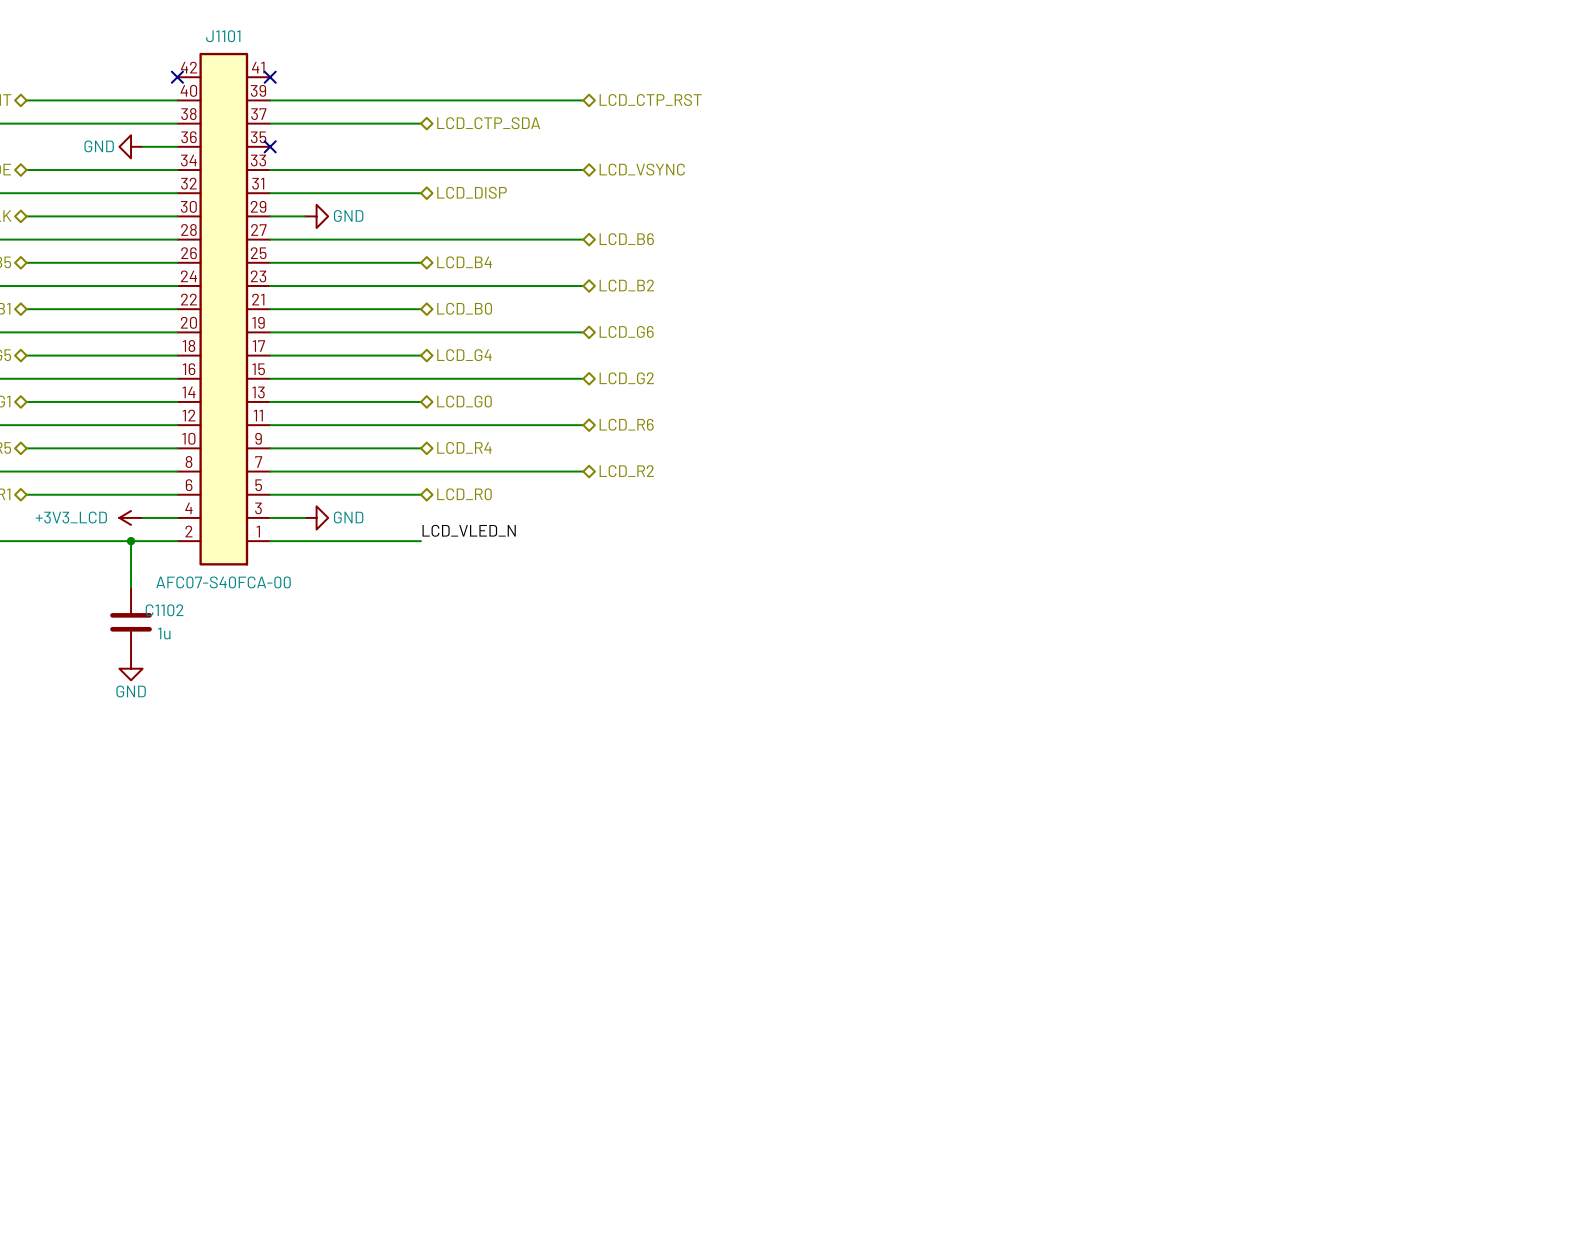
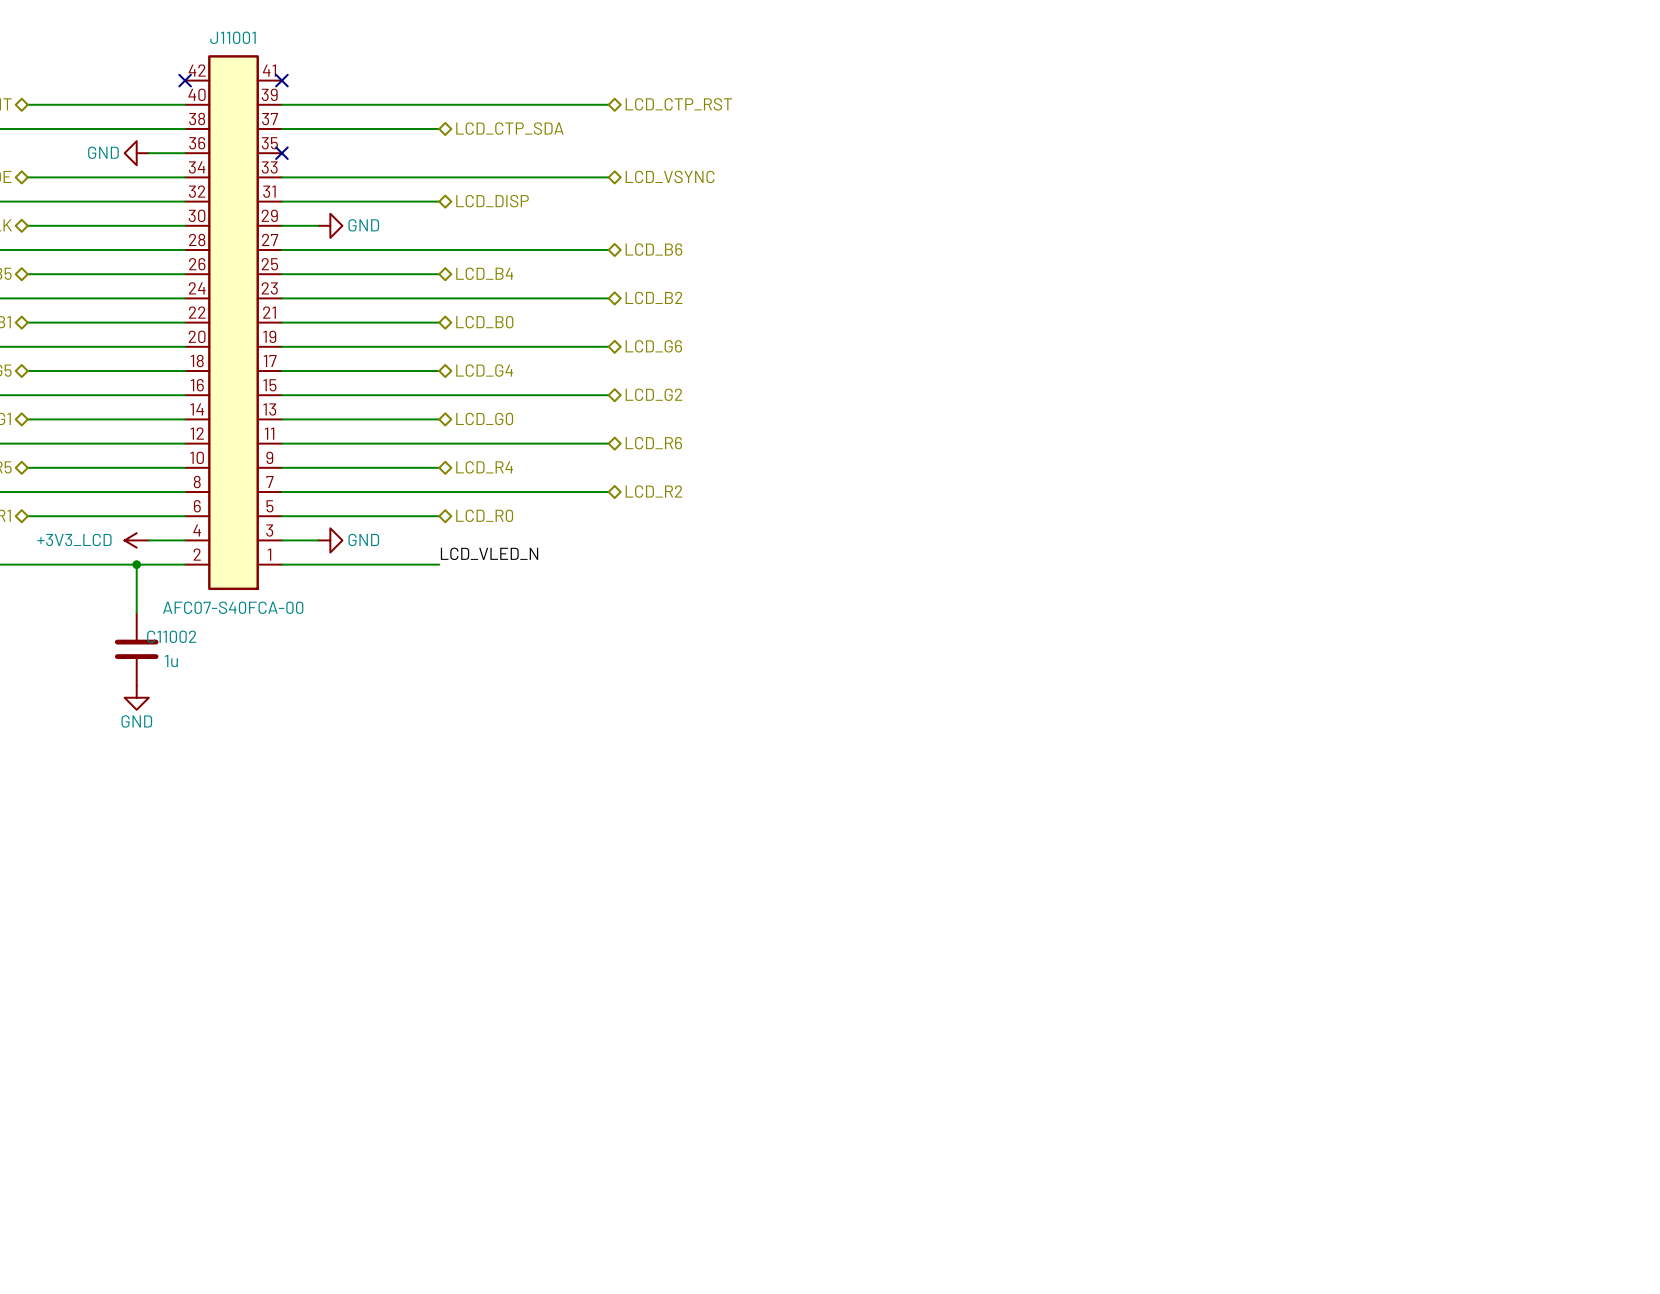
J1101 name: J1101 (223, 36) -> J11001 (232, 37)
C1102 name: C1102 (164, 610) -> C11002 (171, 636)

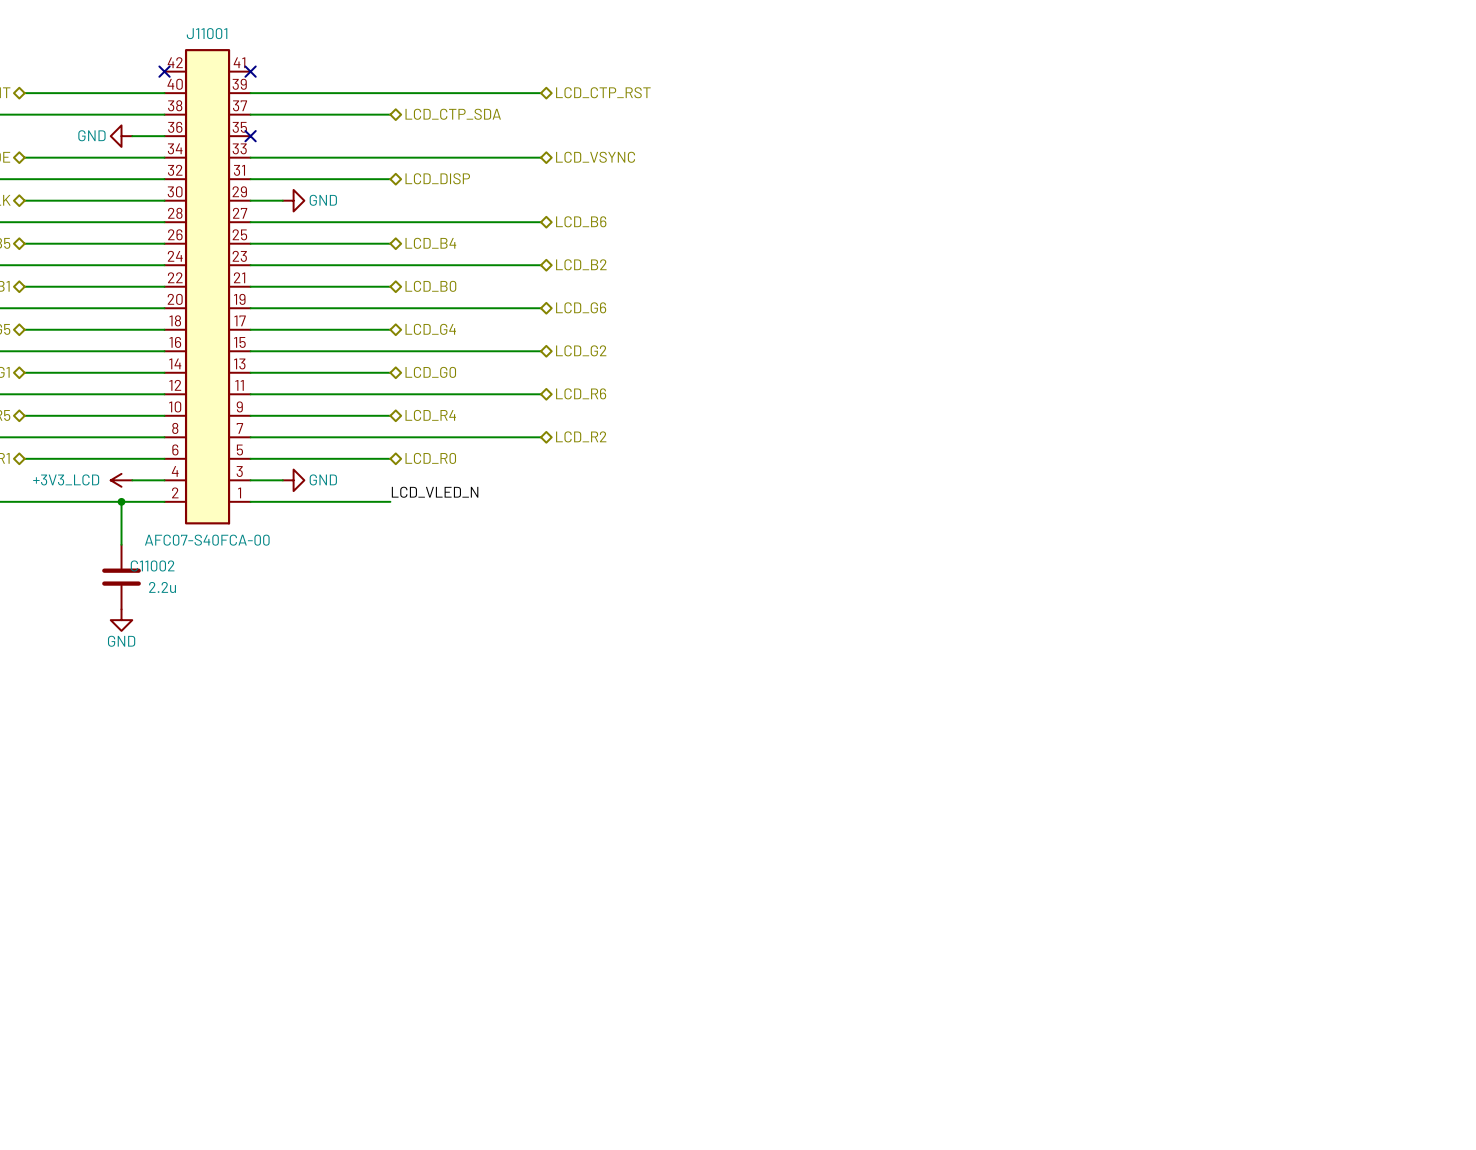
C11002 value: 1u (171, 661) -> 2.2u (162, 587)

